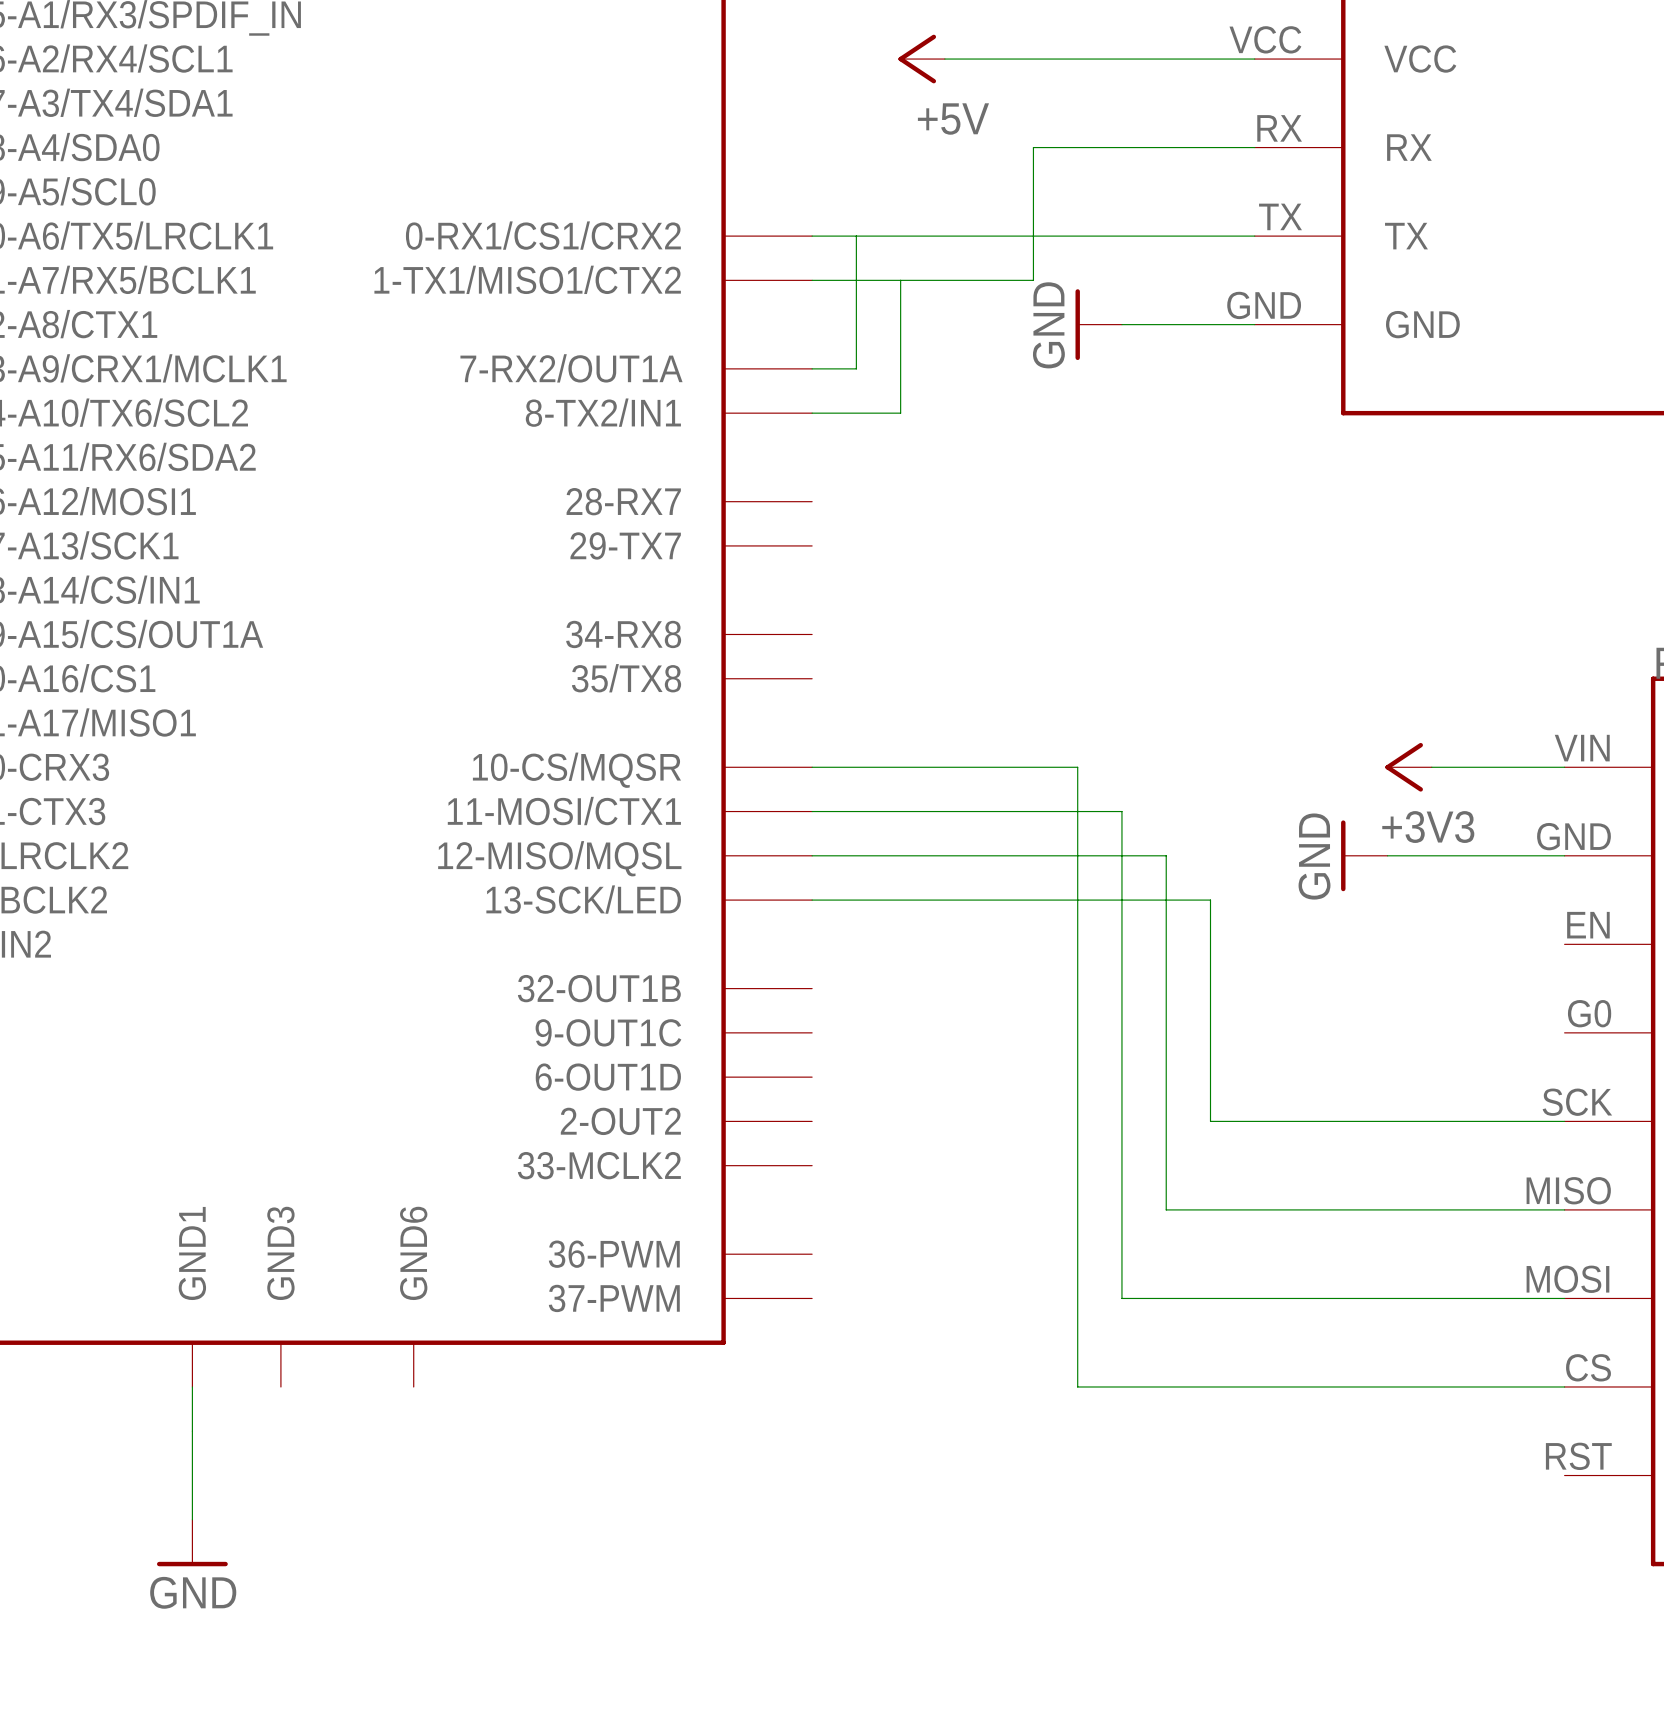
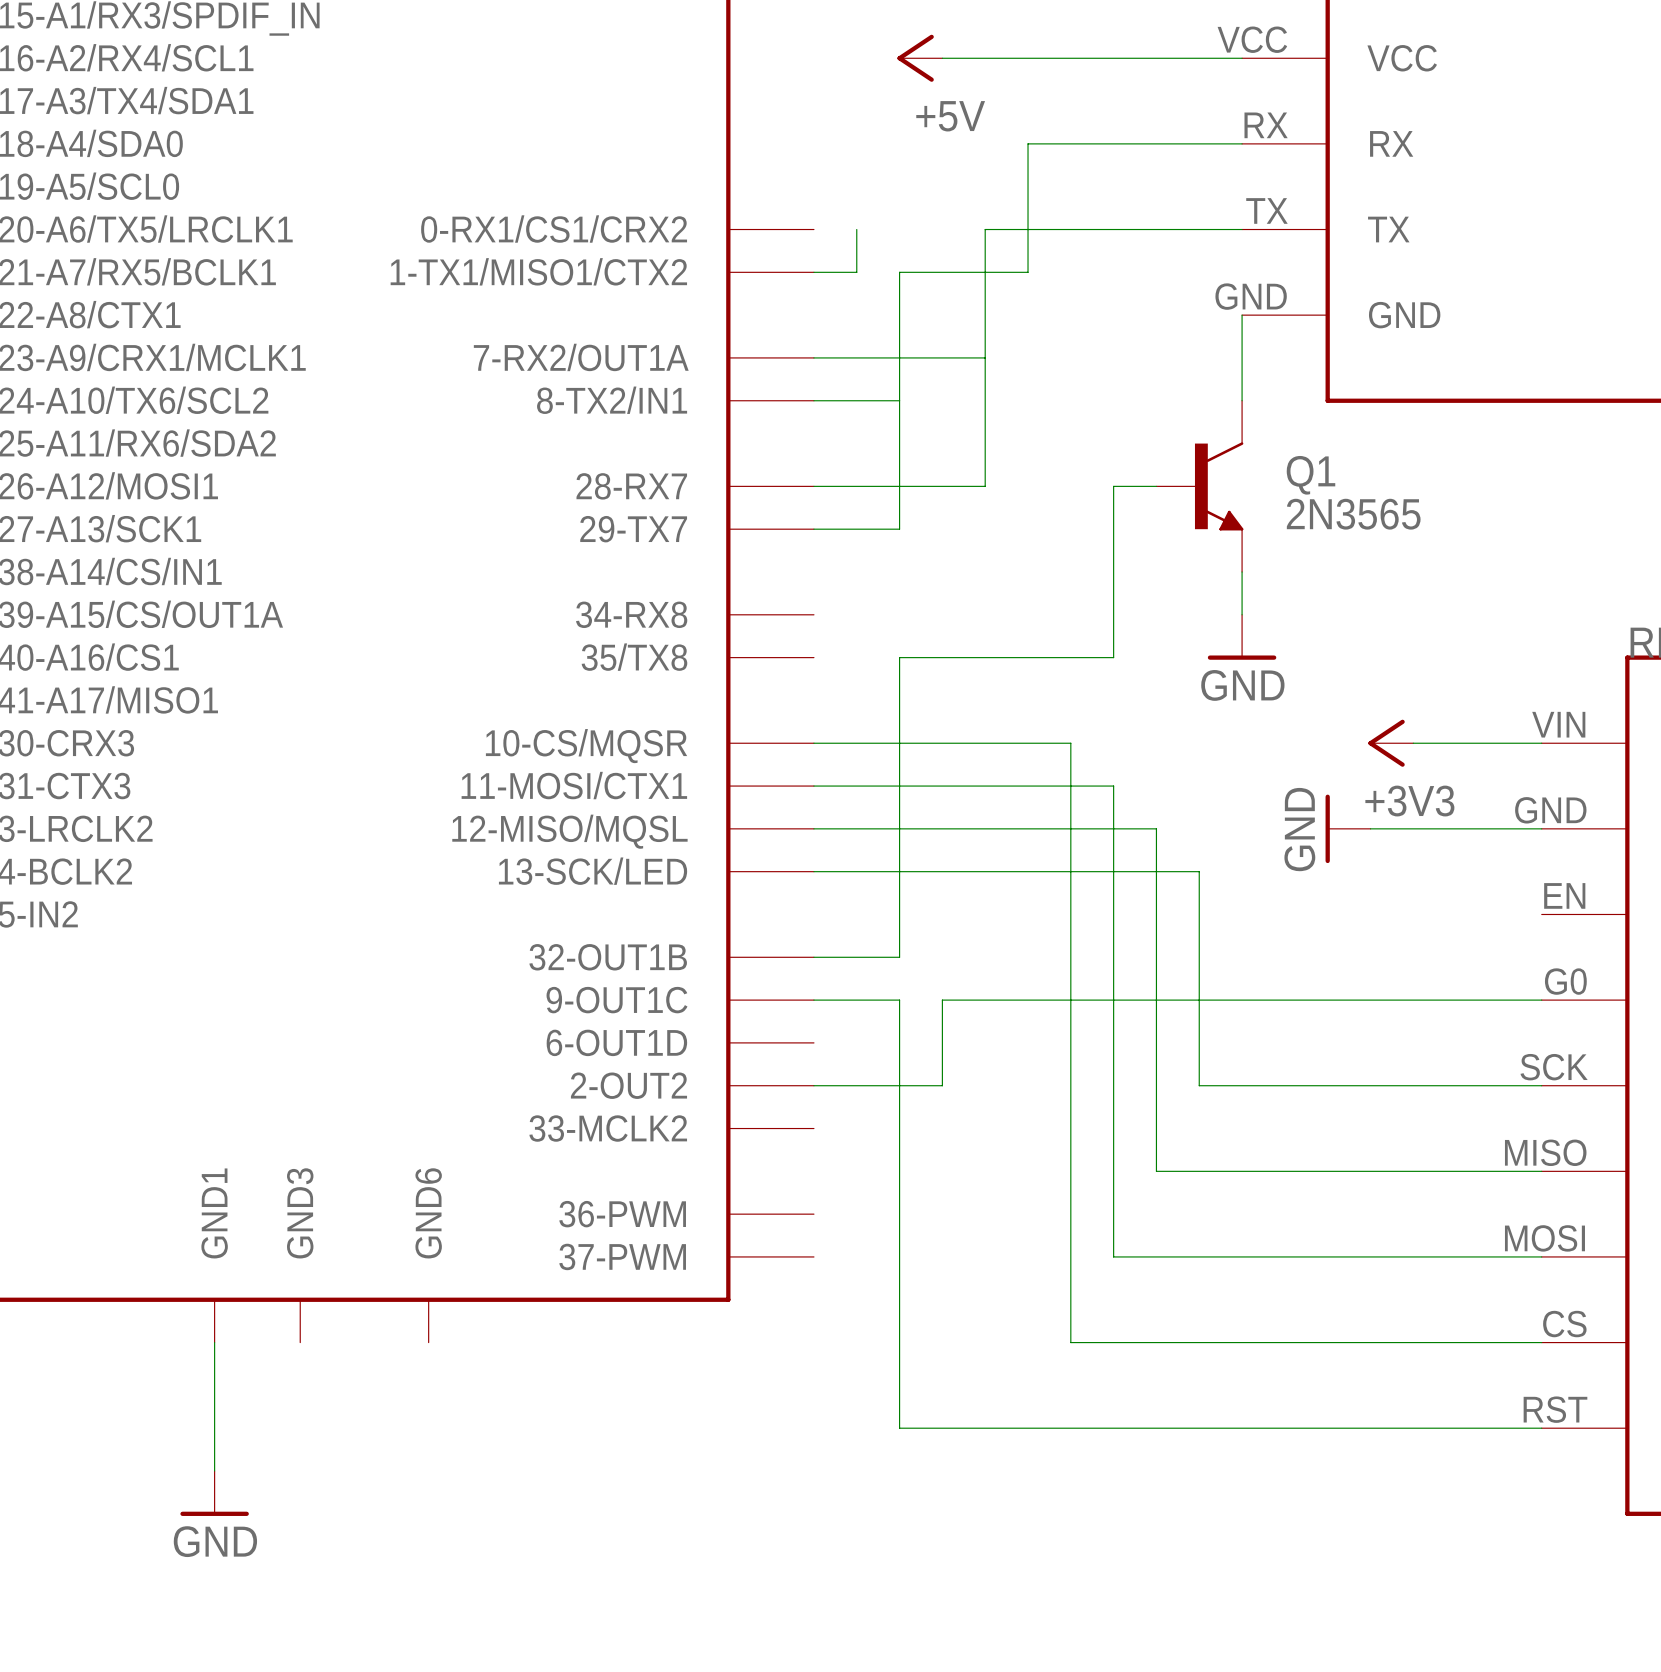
wire: (812, 236) (989, 236) -> (813, 486) (985, 486) (985, 229)
wire: (900, 280) (856, 280) (856, 368) -> (985, 357) (856, 357)
power symbol rotation: 0° (1077, 324) -> 90° counterclockwise (1242, 657)
power symbol position: GND (1098, 324) -> GND (1242, 637)
wire: (1121, 324) (1254, 324) -> (1242, 400) (1242, 315)
wire: none -> (899, 400) (899, 529) (813, 529)
wire: none -> (1156, 486) (1113, 486) (1113, 657) (899, 657) (899, 957) (813, 957)
Q1: none -> 2N3565 (1199, 486)
wire: none -> (1242, 571) (1242, 614)
wire: none -> (813, 1000) (899, 1000) (899, 1428) (1541, 1428)
wire: none -> (1541, 1000) (942, 1000) (942, 1085) (813, 1085)

